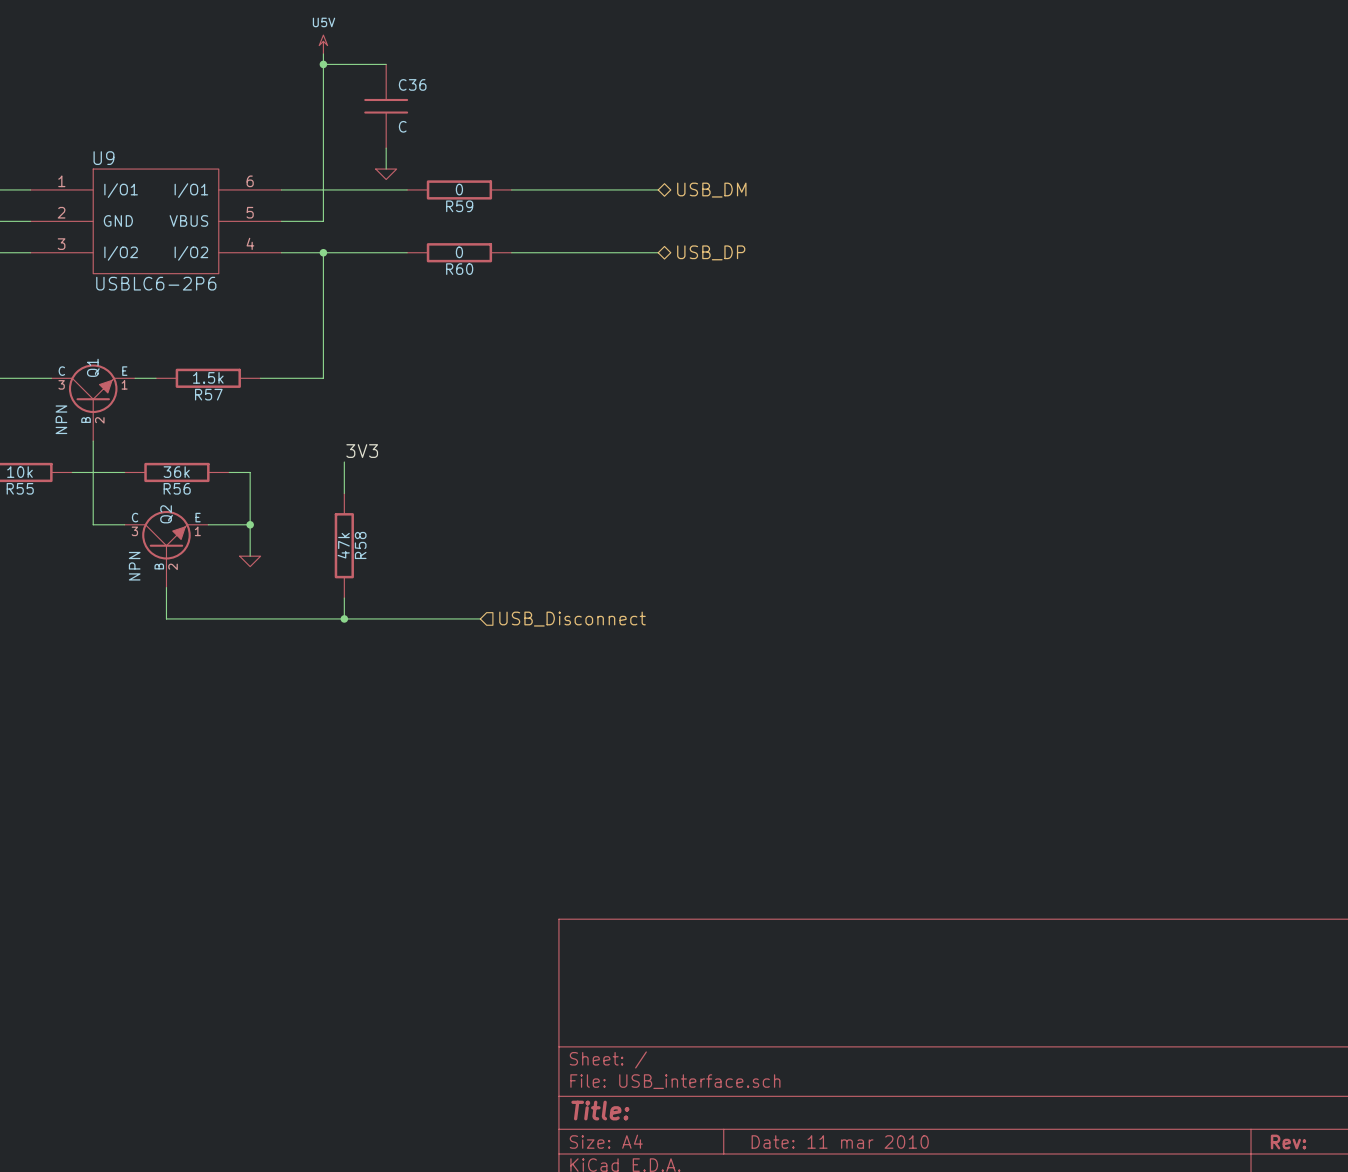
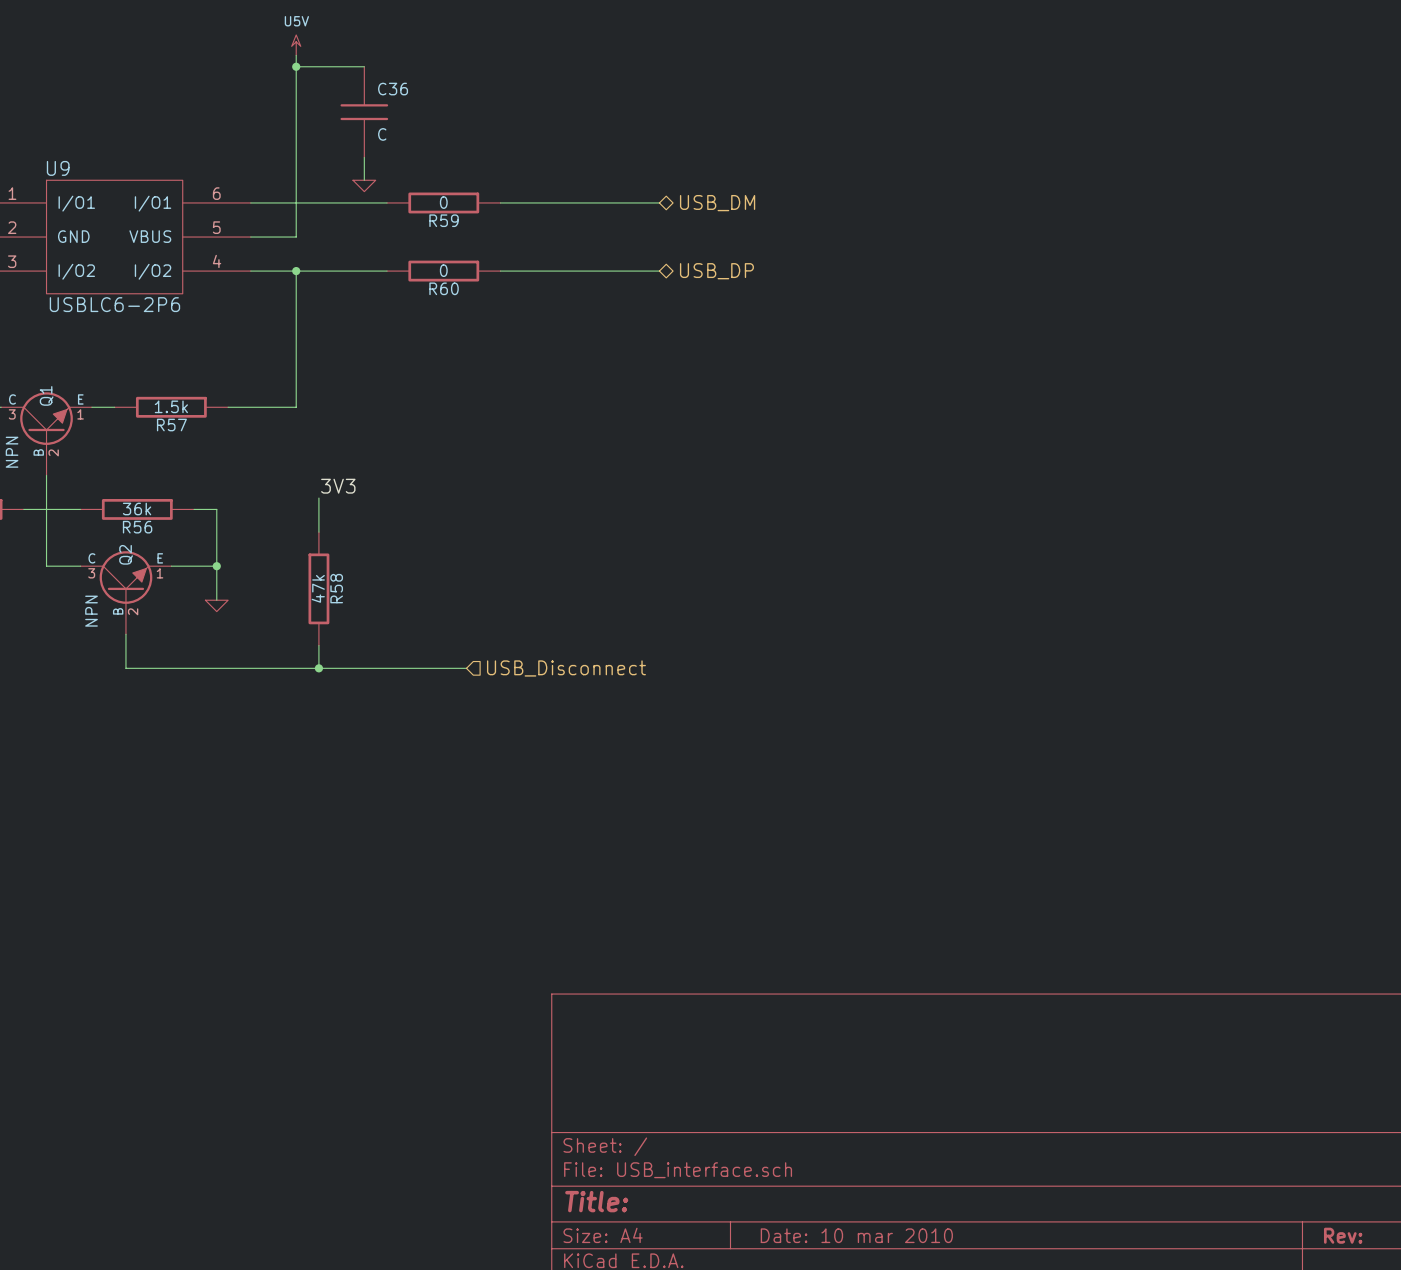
title block: Date: 11 mar 2010 (840, 1142) -> Date: 10 mar 2010 (856, 1235)

